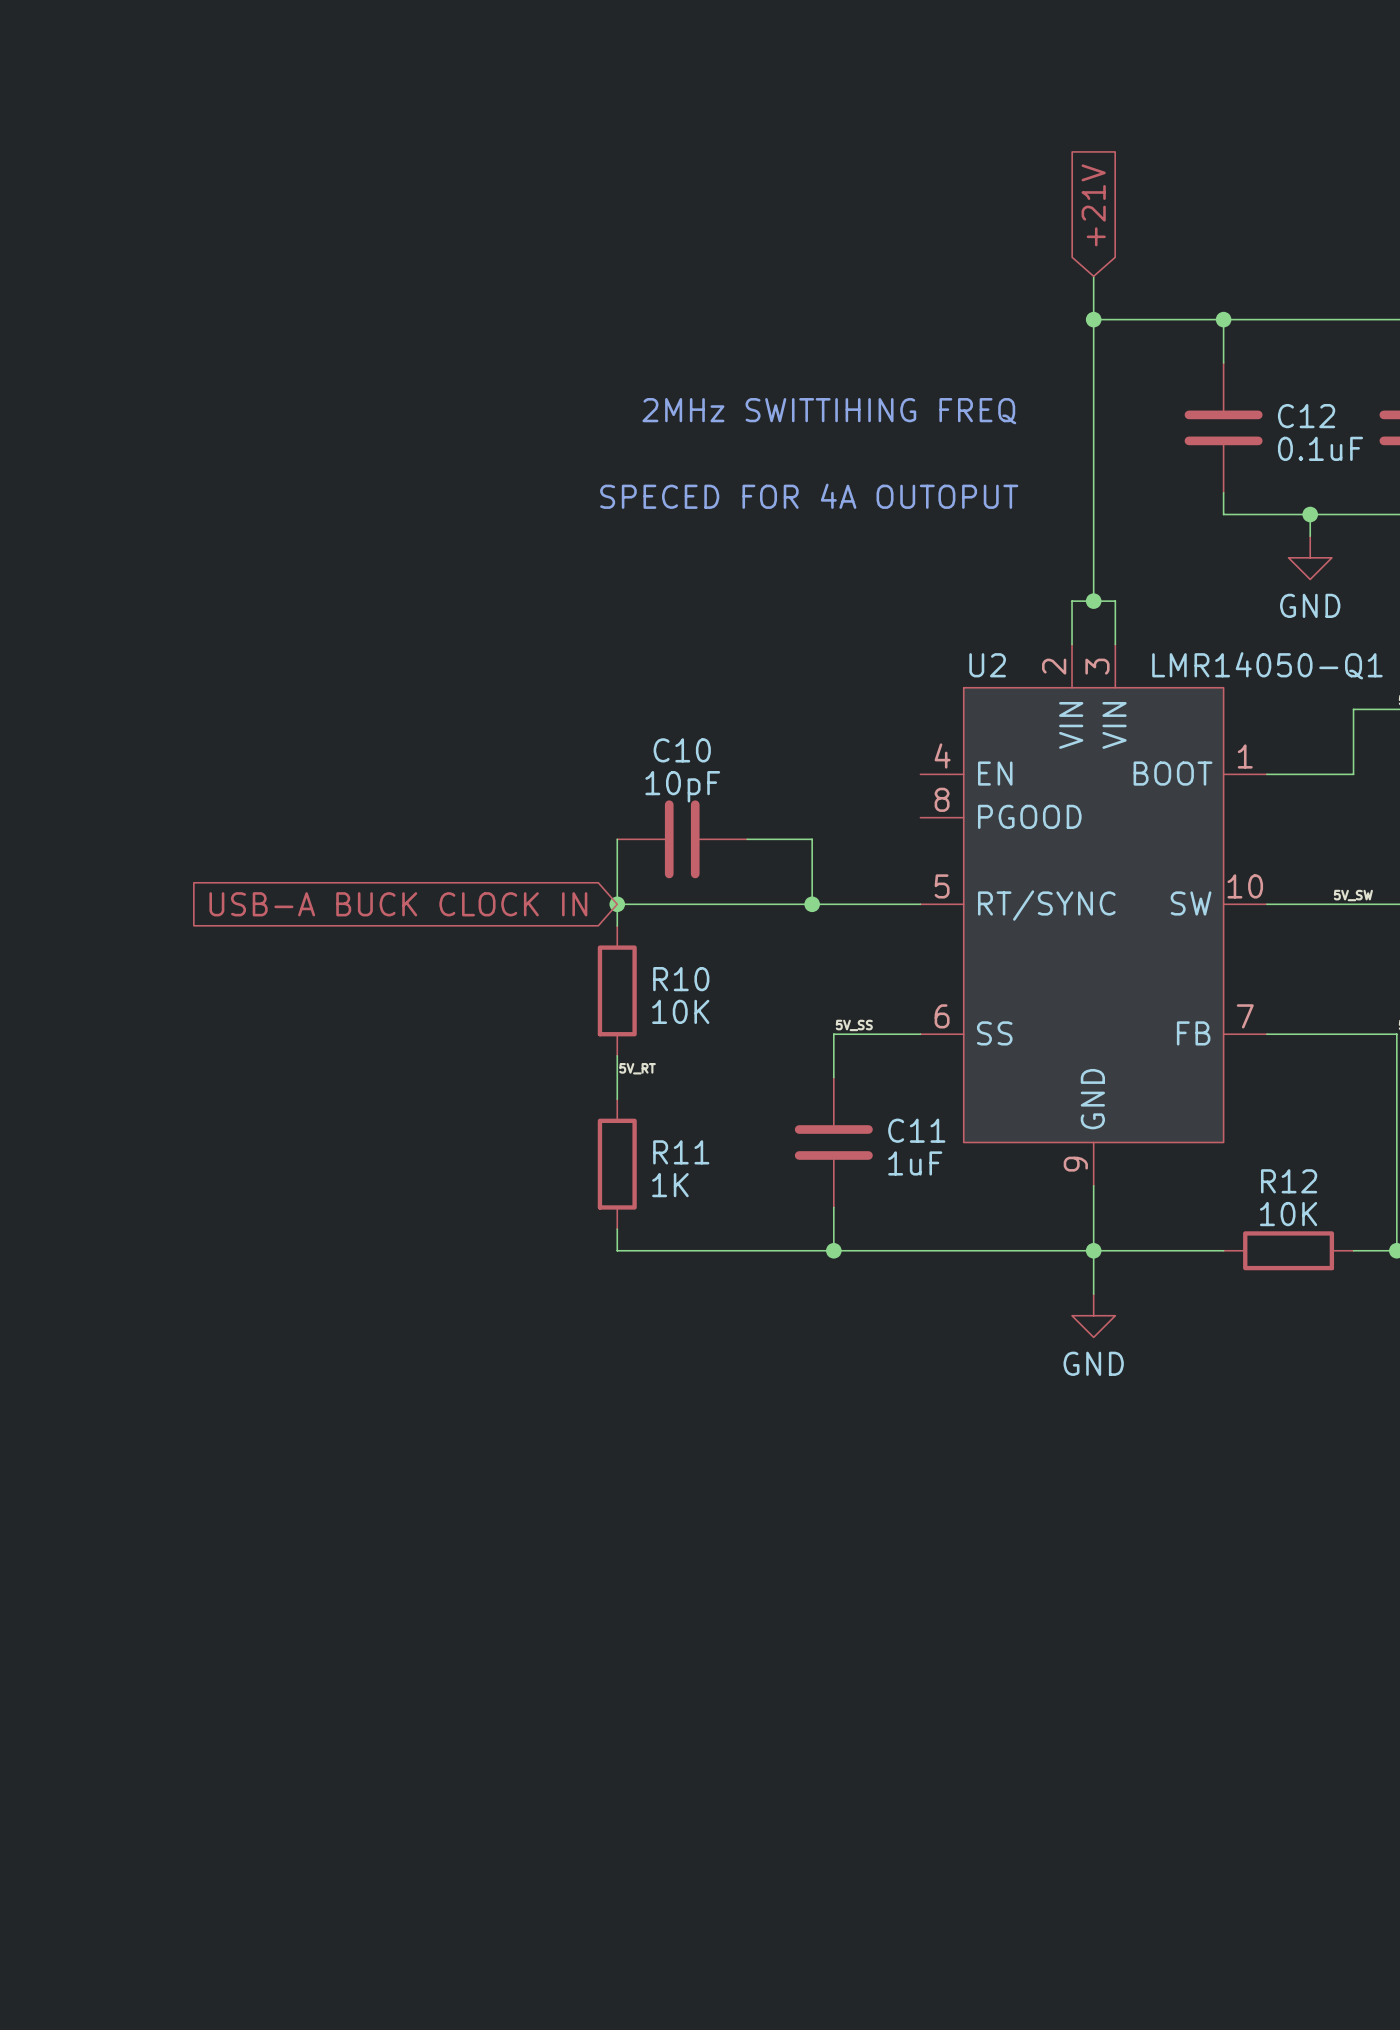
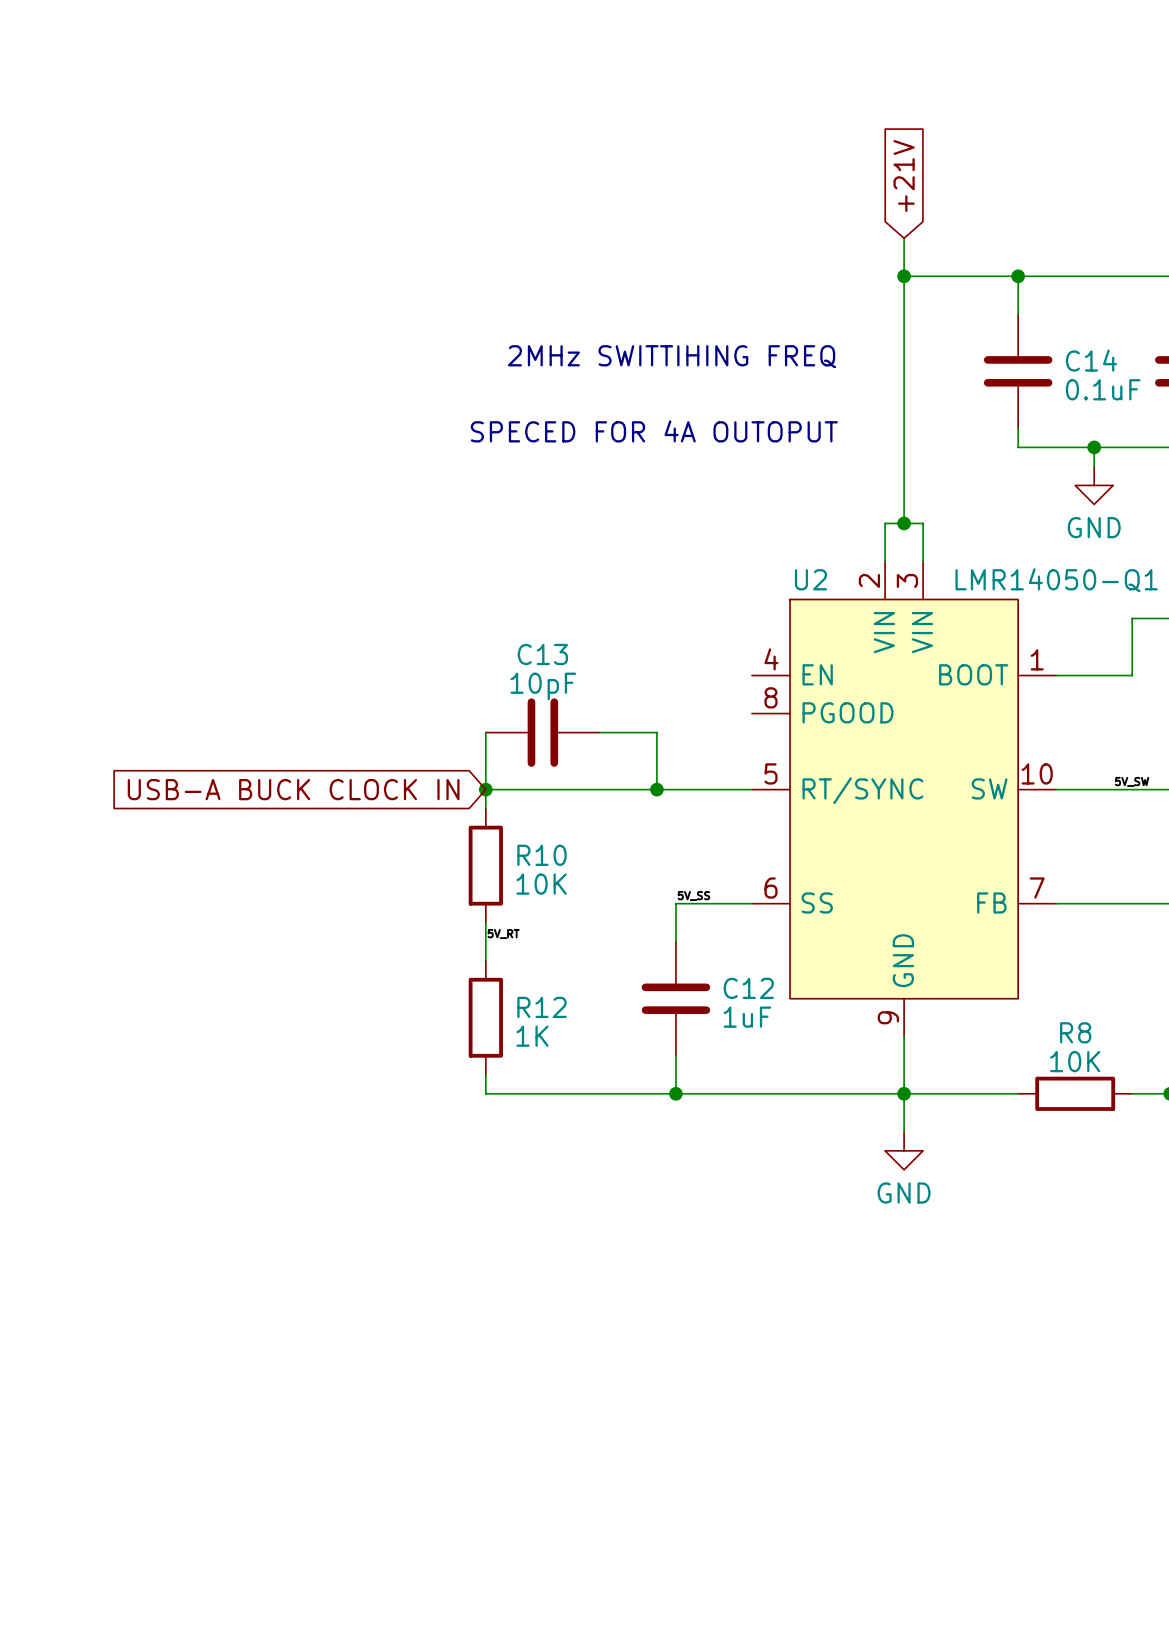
C12 name: C12 (1306, 416) -> C14 (1091, 360)
C10 name: C10 (682, 750) -> C13 (542, 654)
C11 name: C11 (916, 1130) -> C12 (748, 988)
R11 name: R11 (681, 1152) -> R12 (542, 1007)
R12 name: R12 (1289, 1181) -> R8 (1075, 1032)

